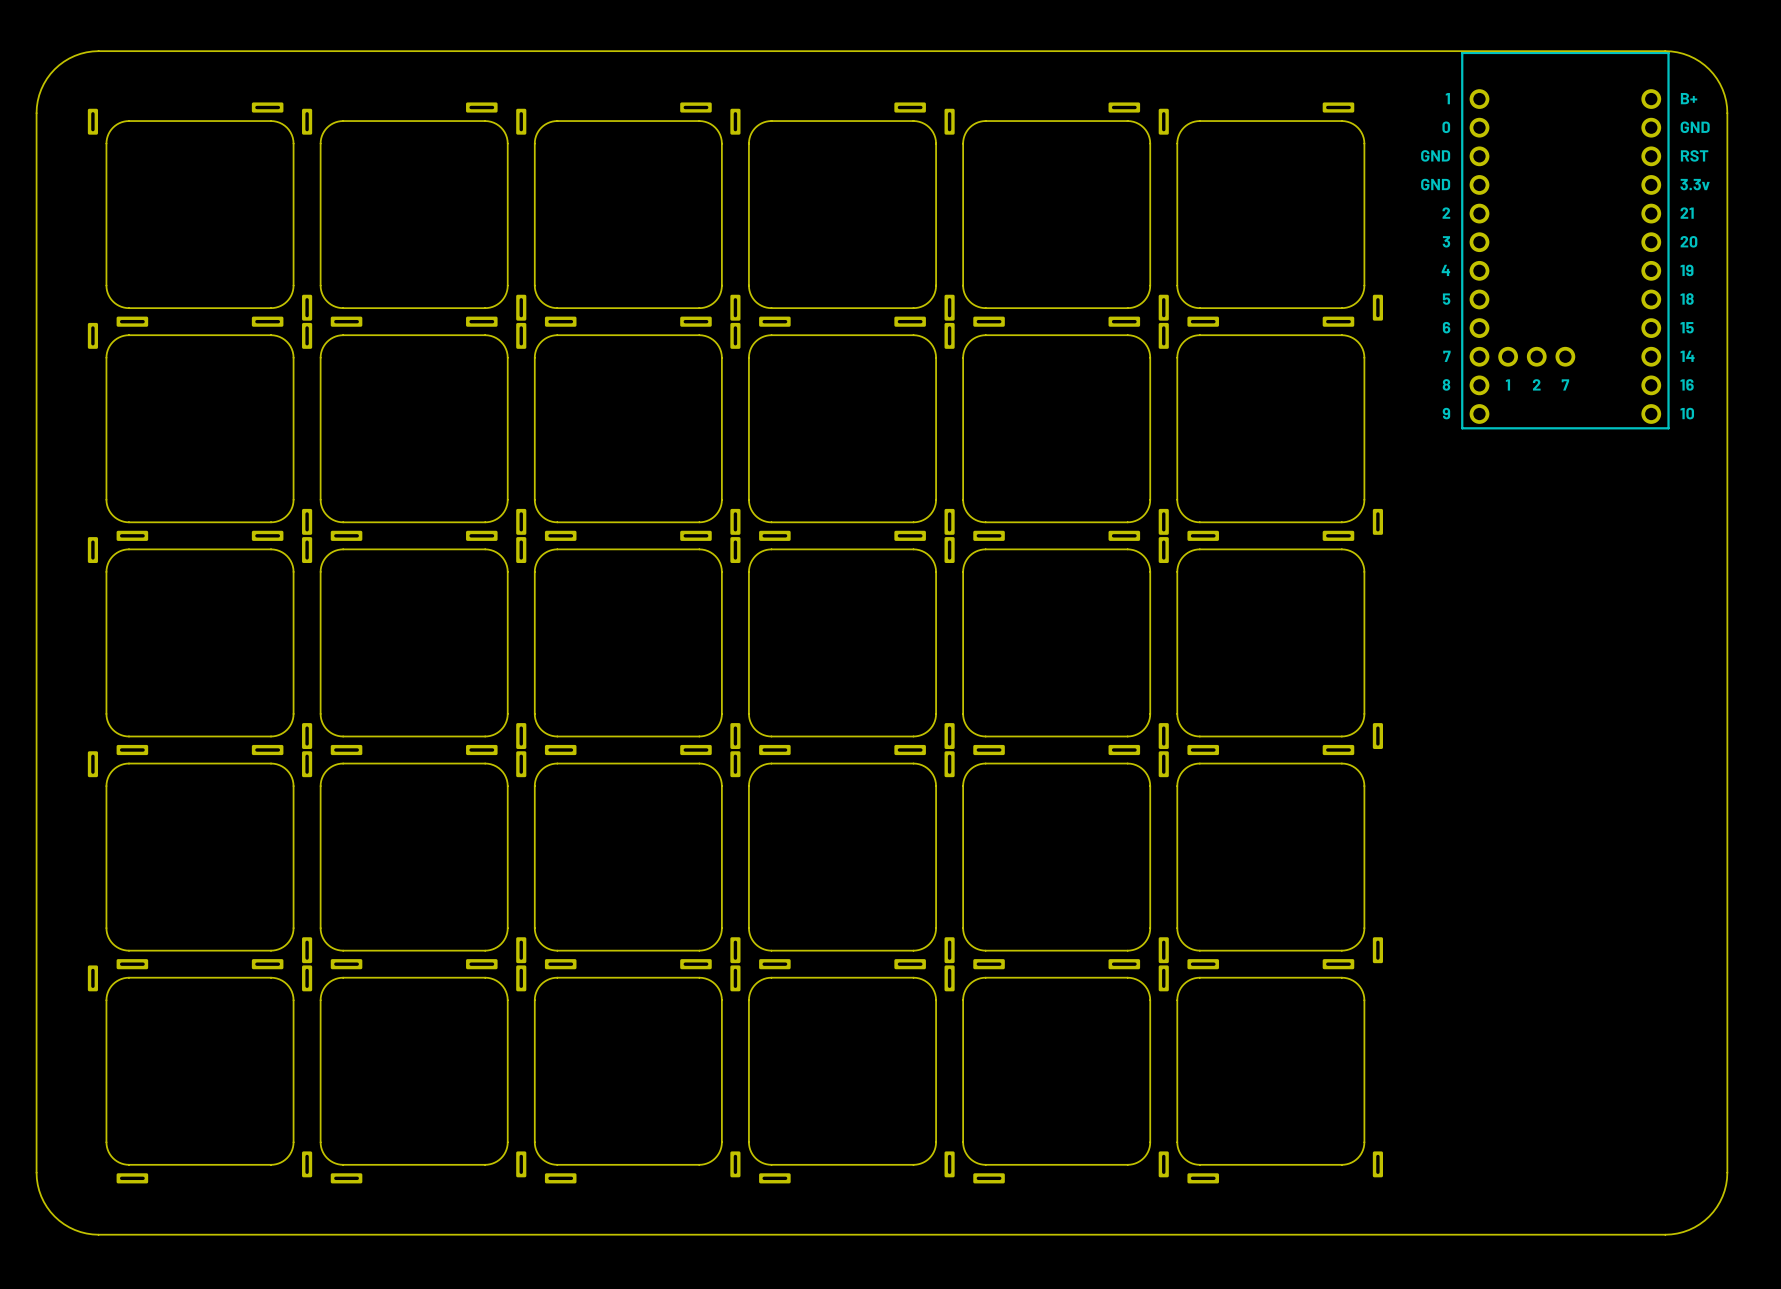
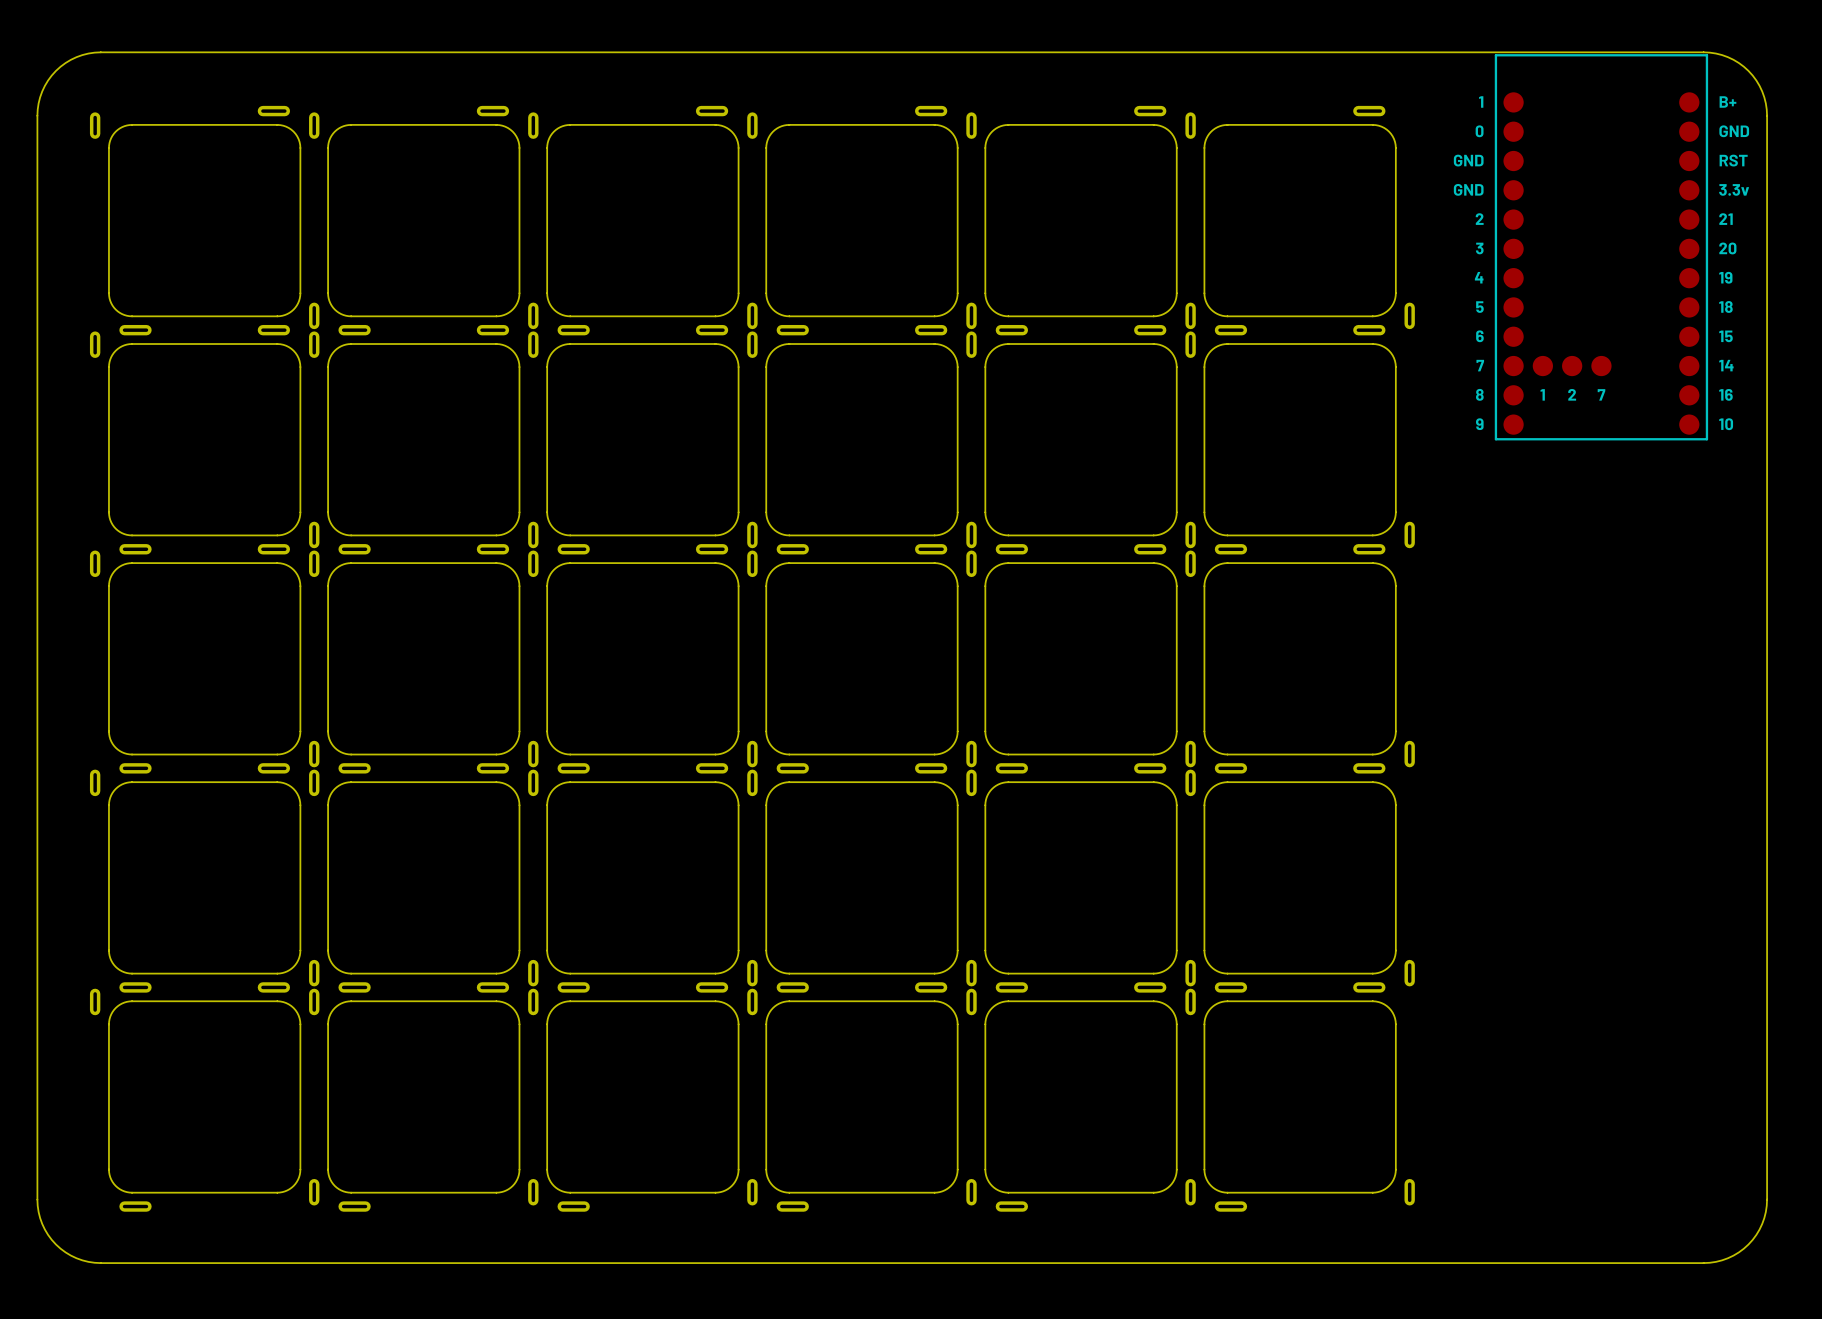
part footprint: [1461, 51, 1670, 430] -> [1494, 54, 1709, 441]
part footprint: [87, 102, 313, 327] -> [89, 105, 320, 336]
part footprint: [302, 102, 527, 327] -> [309, 105, 539, 336]
part footprint: [516, 102, 741, 327] -> [528, 105, 758, 336]
part footprint: [730, 102, 955, 327] -> [747, 105, 977, 336]
part footprint: [944, 102, 1169, 327] -> [966, 105, 1196, 336]
part footprint: [1158, 102, 1383, 327] -> [1185, 105, 1415, 336]
part footprint: [87, 316, 313, 541] -> [89, 324, 320, 555]
part footprint: [302, 316, 527, 541] -> [309, 324, 539, 555]
part footprint: [516, 316, 741, 541] -> [528, 324, 758, 555]
part footprint: [730, 316, 955, 541] -> [747, 324, 977, 555]
part footprint: [944, 316, 1169, 541] -> [966, 324, 1196, 555]
part footprint: [1158, 316, 1383, 541] -> [1185, 324, 1415, 555]
part footprint: [87, 530, 313, 756] -> [89, 544, 320, 774]
part footprint: [302, 530, 527, 756] -> [309, 544, 539, 774]
part footprint: [516, 530, 741, 756] -> [528, 544, 758, 774]
part footprint: [730, 530, 955, 756] -> [747, 544, 977, 774]
part footprint: [944, 530, 1169, 756] -> [966, 544, 1196, 774]
part footprint: [1158, 530, 1383, 756] -> [1185, 544, 1415, 774]
part footprint: [87, 744, 313, 970] -> [89, 763, 320, 993]
part footprint: [302, 744, 527, 970] -> [309, 763, 539, 993]
part footprint: [516, 744, 741, 970] -> [528, 763, 758, 993]
part footprint: [730, 744, 955, 970] -> [747, 763, 977, 993]
part footprint: [944, 744, 1169, 970] -> [966, 763, 1196, 993]
part footprint: [1158, 744, 1383, 970] -> [1185, 763, 1415, 993]
part footprint: [87, 959, 313, 1184] -> [89, 982, 320, 1212]
part footprint: [302, 959, 527, 1184] -> [309, 982, 539, 1212]
part footprint: [516, 959, 741, 1184] -> [528, 982, 758, 1212]
part footprint: [730, 959, 955, 1184] -> [747, 982, 977, 1212]
part footprint: [944, 959, 1169, 1184] -> [966, 982, 1196, 1212]
part footprint: [1158, 959, 1383, 1184] -> [1185, 982, 1415, 1212]

